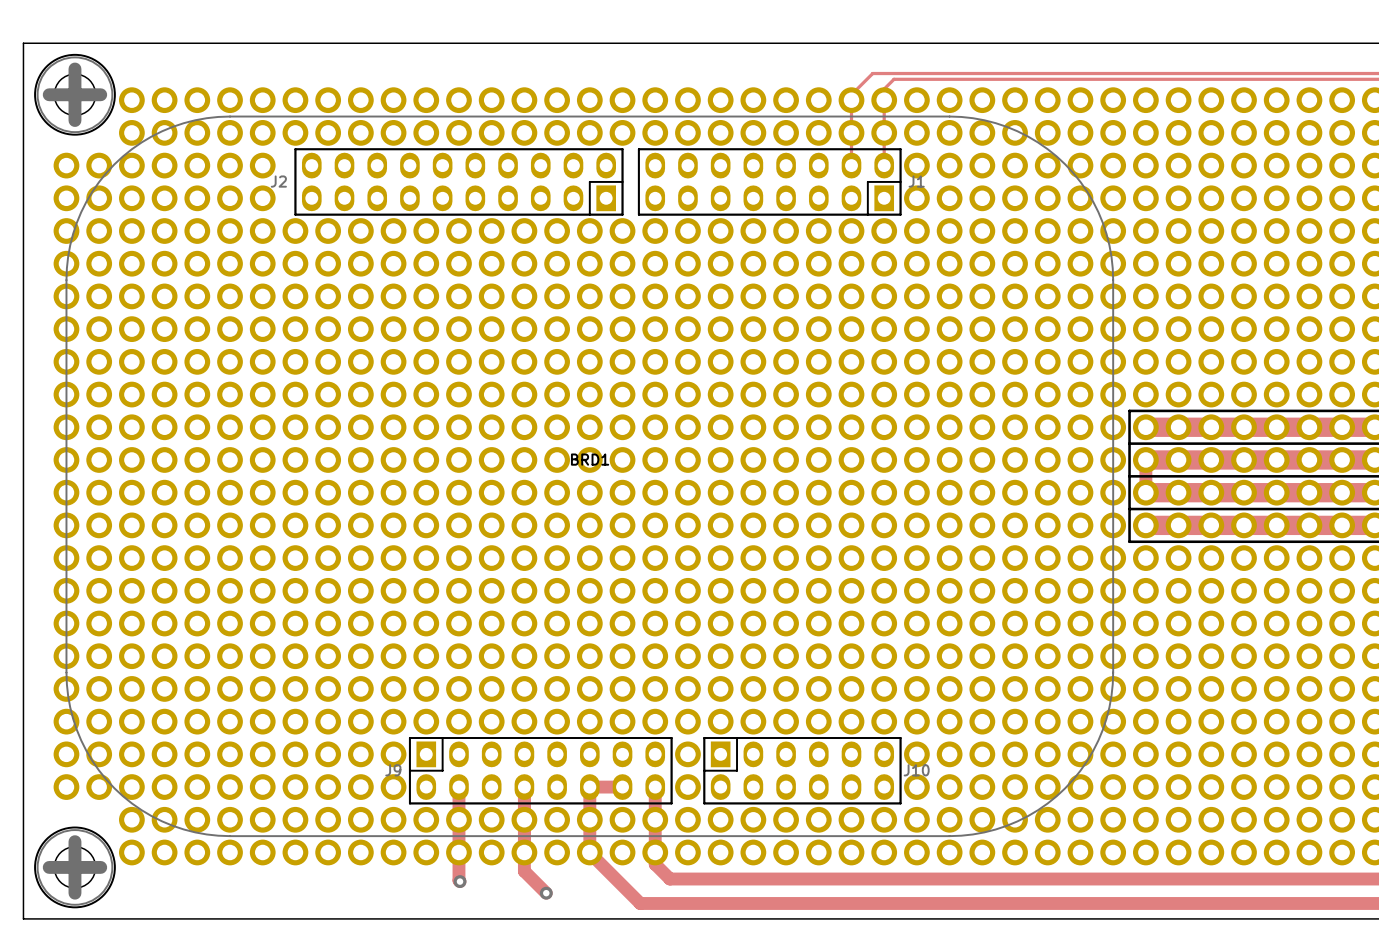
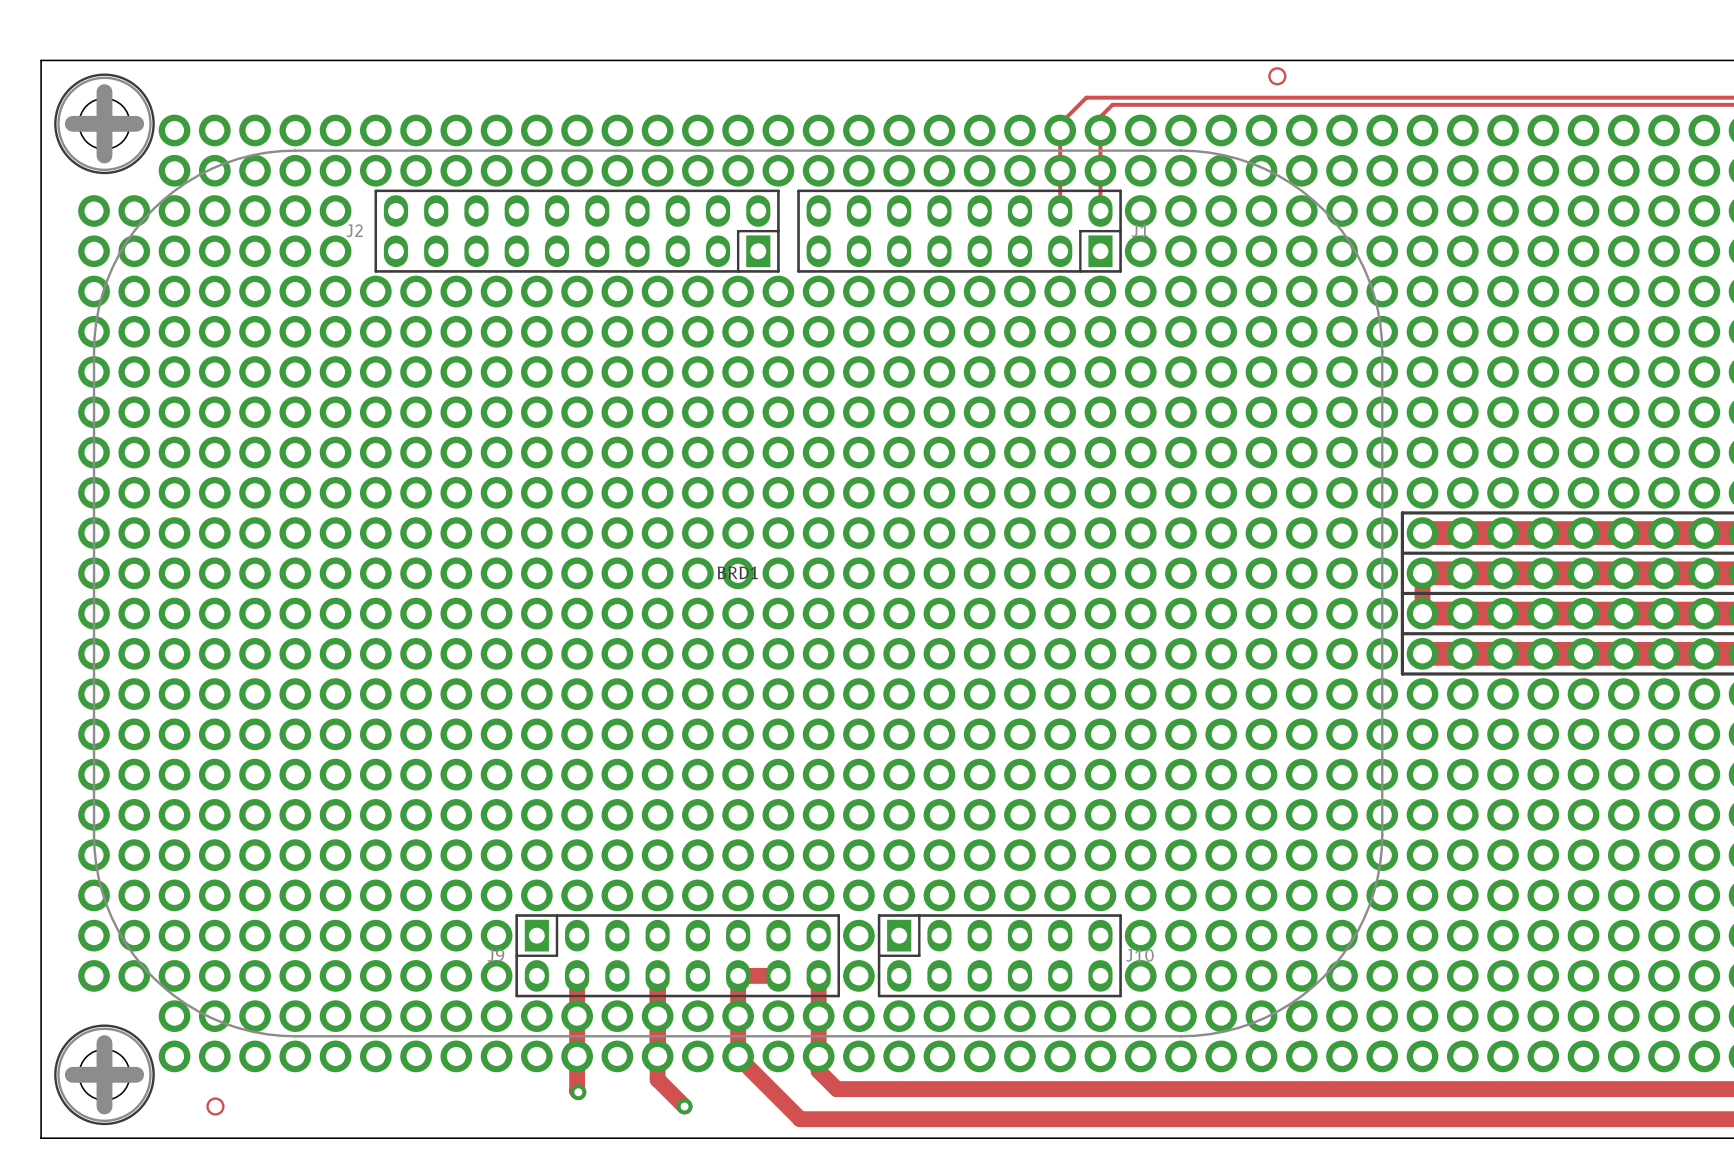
drawing: none -> [1268, 67, 1287, 86]
drawing: none -> [206, 1097, 225, 1116]

